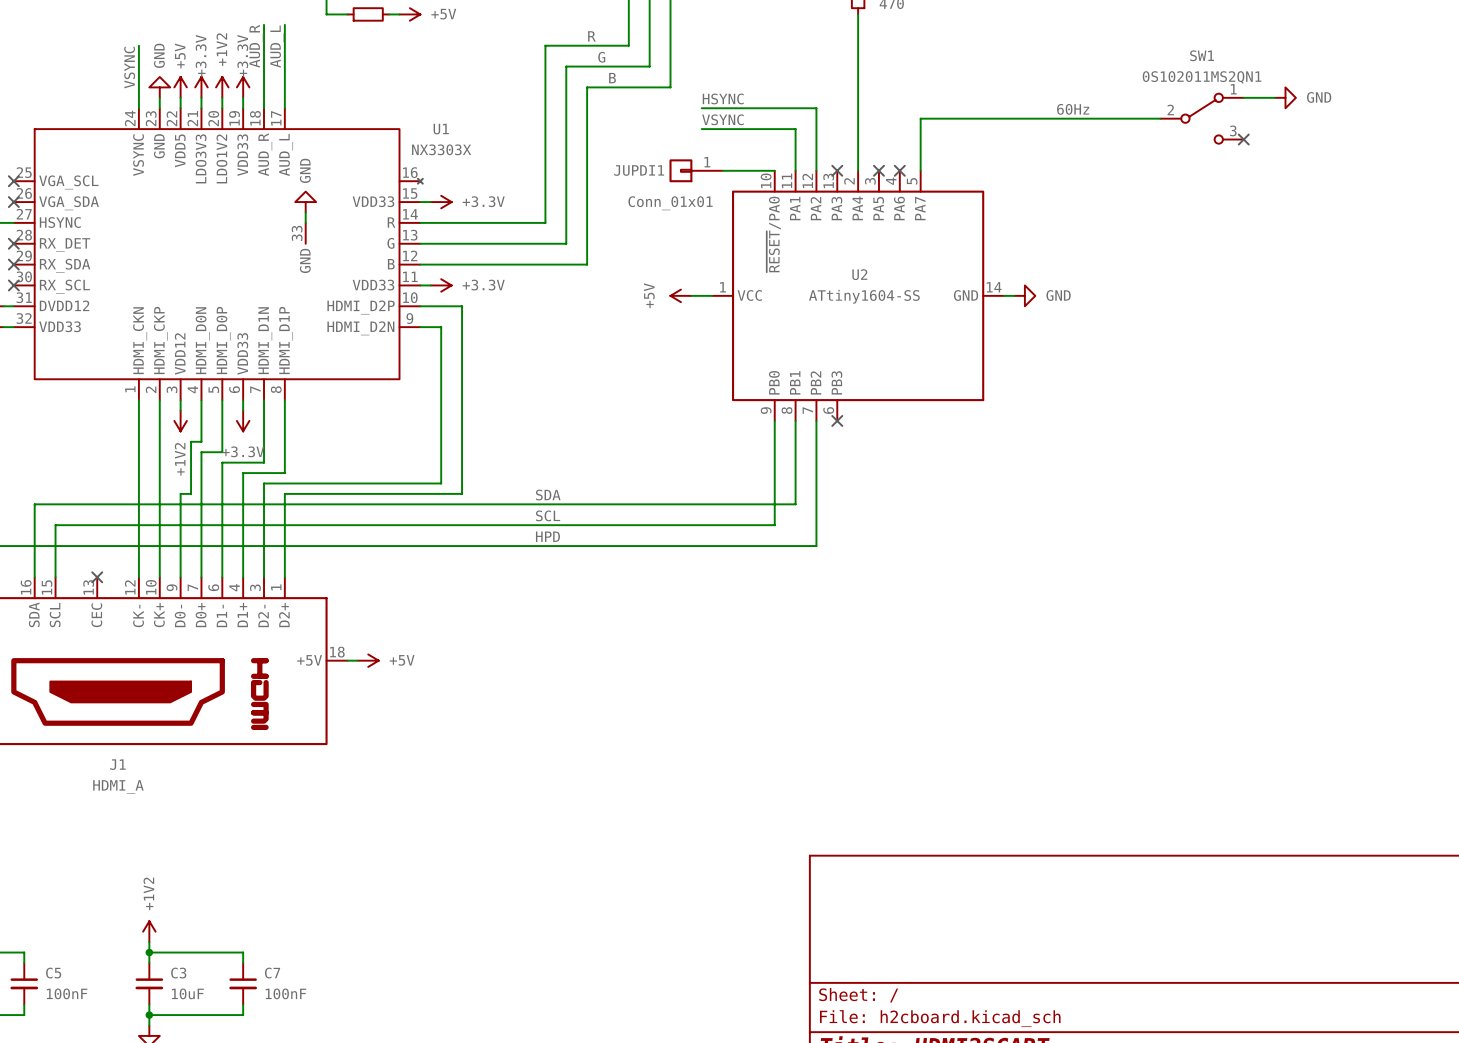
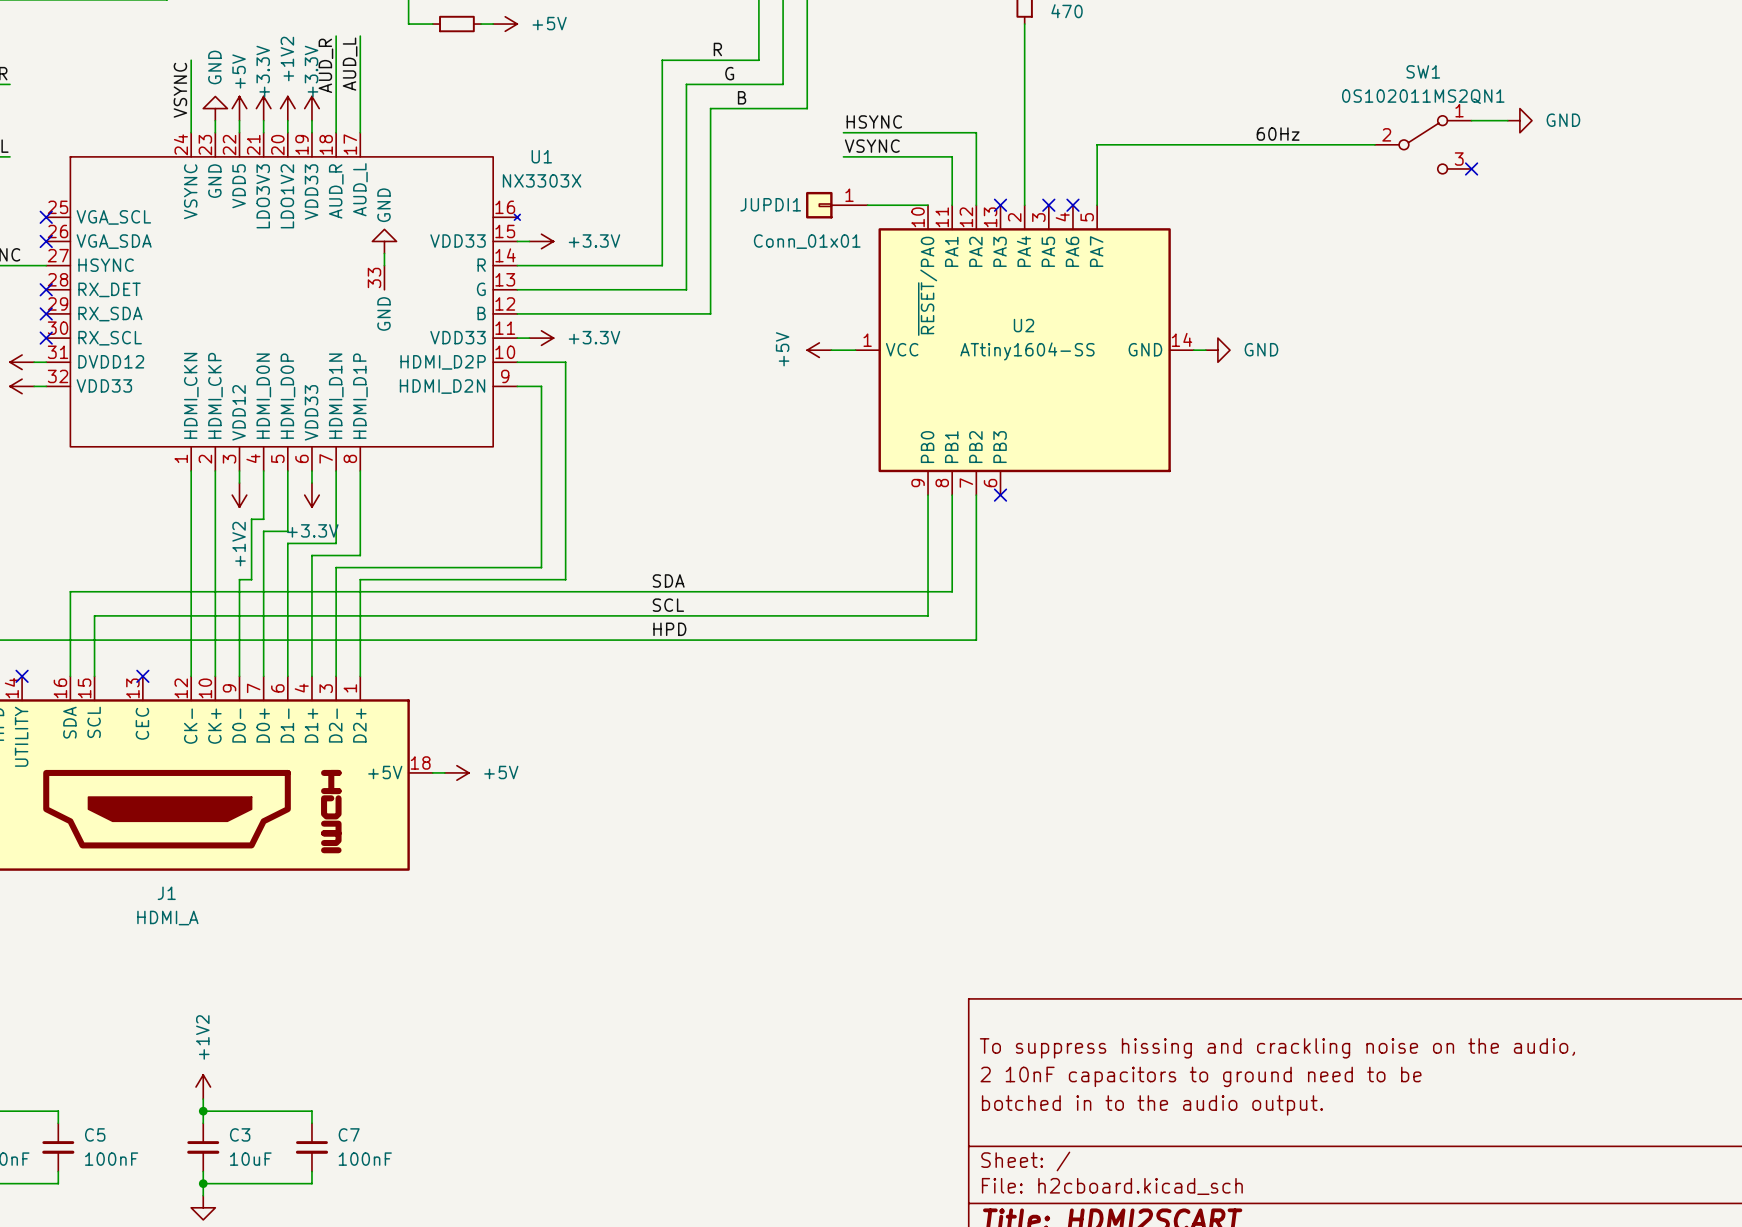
title block: none -> To suppress hissing and crackling noise on the audio, (1277, 1048)
title block: none -> 2 10nF capacitors to ground need to be (1201, 1076)
title block: none -> botched in to the audio output. (1152, 1105)

